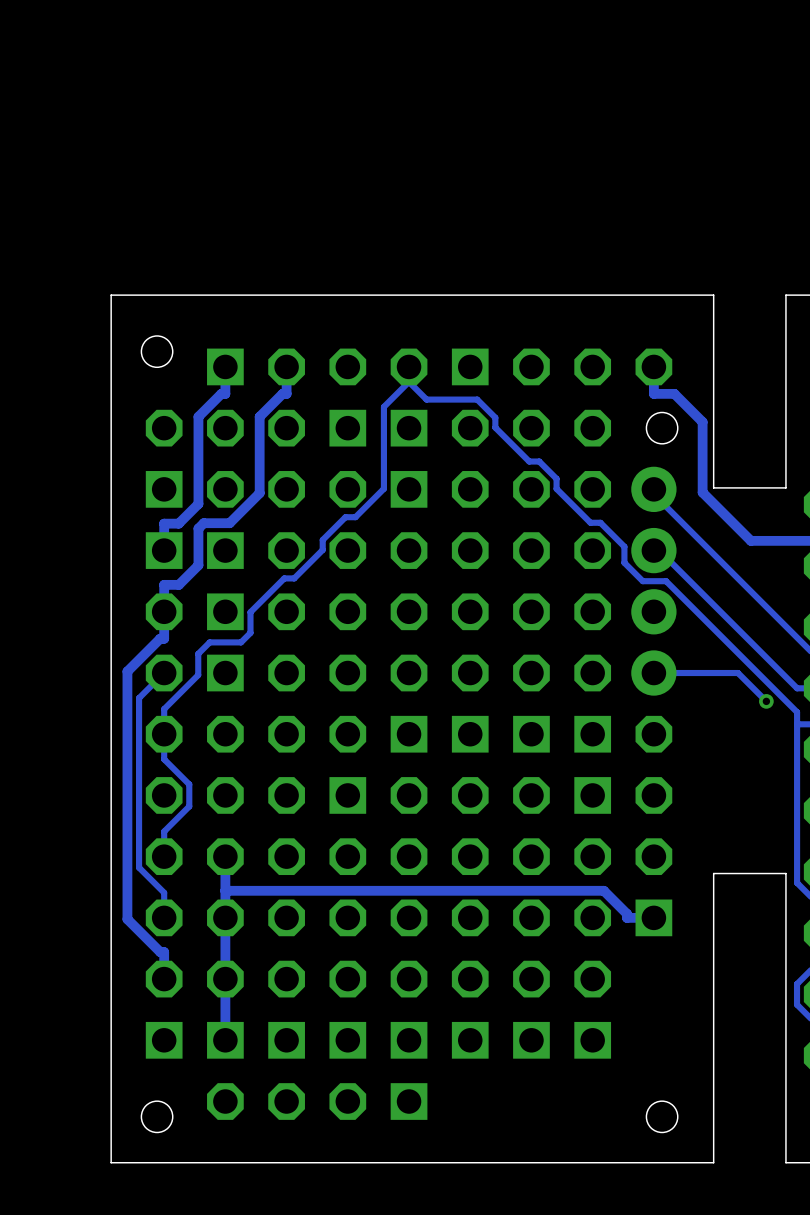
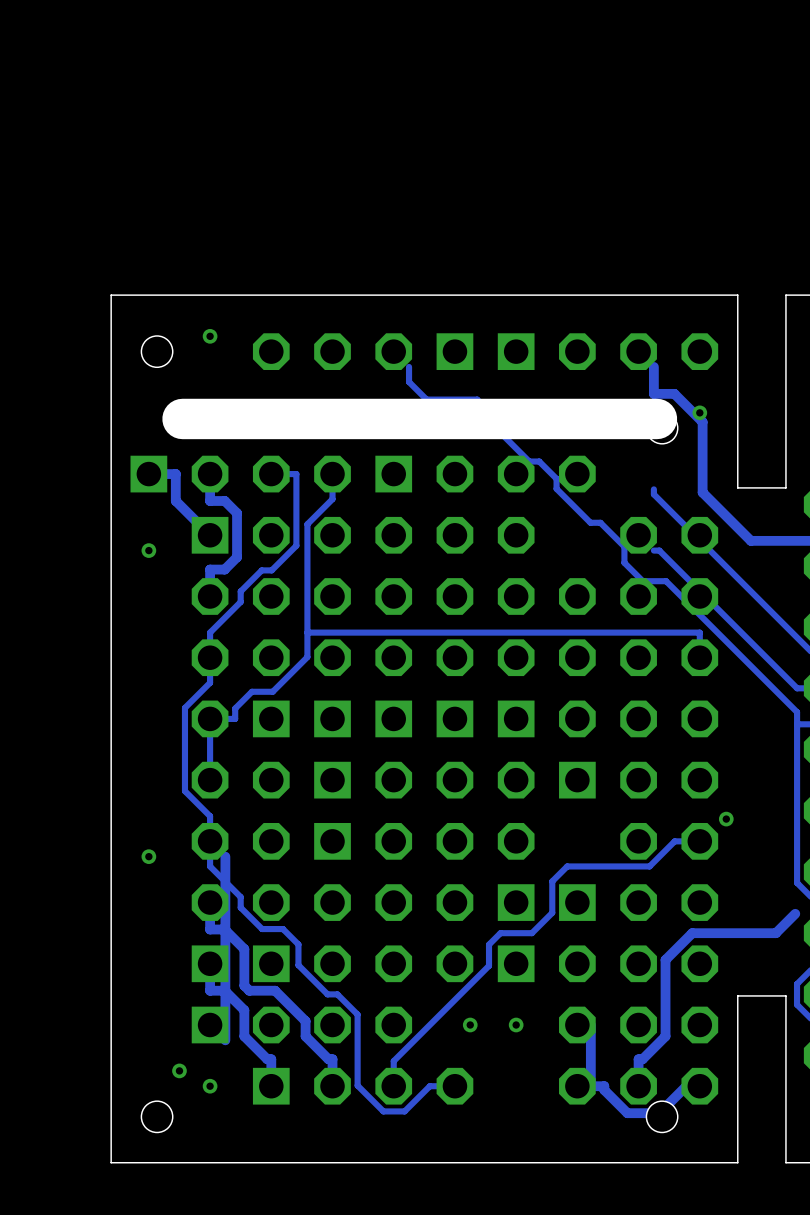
board edge: (713, 295) (713, 487) (737, 487) -> (713, 295) (737, 295) (737, 487)
via: none -> (210, 336)
track: (225, 366) (225, 393) (221, 393) (198, 416) (198, 503) (178, 523) (164, 523) (164, 550) -> none
track: (286, 366) (286, 393) (282, 393) (259, 416) (259, 493) (229, 523) (203, 523) (198, 528) (198, 565) (178, 584) (164, 584) (164, 638) (160, 638) (127, 671) (127, 919) (160, 952) (164, 952) (164, 979) -> none
part rotation: 0° (317, 366) -> 180° (363, 351)
part position: (562, 366) -> (607, 351)
track: (408, 382) (383, 406) (383, 488) (355, 517) (345, 517) (322, 539) (322, 549) (294, 578) (284, 578) (250, 612) (250, 632) (241, 642) (209, 642) (198, 653) (198, 675) (164, 709) (164, 759) (189, 784) (189, 806) (164, 831) (164, 856) -> none
via: none -> (699, 412)
board edge: none -> (656, 418) (182, 418)
part: (256, 428) -> none
part: (500, 428) -> none
track: none -> (148, 474) (175, 474) (175, 501) (210, 535)
track: none -> (210, 474) (210, 501) (224, 501) (237, 513) (237, 557) (224, 569) (210, 569) (210, 596)
track: none -> (271, 474) (296, 474) (296, 545) (271, 570) (261, 570) (240, 591) (240, 602) (210, 632) (210, 682) (184, 707) (184, 791) (210, 816) (210, 866) (240, 897) (240, 907) (262, 929) (283, 929) (298, 944) (298, 965) (327, 994) (337, 994) (357, 1014) (357, 1085) (383, 1111) (404, 1111) (429, 1086) (454, 1086)
track: none -> (332, 474) (332, 499) (307, 524) (307, 657) (272, 691) (251, 691) (235, 708) (235, 718) (210, 718) (210, 780)
part position: (256, 489) -> (240, 474)
part position: (500, 489) -> (485, 474)
via: none -> (148, 550)
part: (317, 550) -> none
part: (653, 581) -> none
part rotation: 0° (317, 611) -> 90° counterclockwise (332, 627)
part: none -> (271, 627)
part: none -> (393, 627)
track: none -> (307, 632) (699, 632) (699, 657)
part position: (164, 642) -> (210, 627)
part position: (470, 642) -> (454, 627)
part position: (531, 642) -> (516, 627)
part position: (592, 642) -> (577, 688)
track: (164, 673) (139, 698) (139, 867) (164, 892) (164, 917) -> none
part: (317, 673) -> none
track: (653, 673) (738, 673) (766, 701) -> none
via: (766, 701) -> none
part footprint: [635, 715, 673, 937] -> [620, 516, 719, 1105]
part: (317, 734) -> none
part: none -> (424, 780)
part: (256, 795) -> none
part: (500, 795) -> none
via: none -> (726, 819)
part: none -> (424, 841)
track: none -> (699, 841) (674, 841) (649, 866) (567, 866) (552, 881) (552, 912) (531, 933) (500, 933) (489, 944) (489, 965) (393, 1061) (393, 1086)
via: none -> (148, 856)
part: none -> (210, 871)
part: none -> (271, 871)
track: (225, 890) (603, 890) (626, 913) (626, 917) (653, 917) -> none
track: none -> (210, 902) (210, 929) (224, 929) (244, 949) (244, 985) (249, 990) (275, 990) (305, 1021) (305, 1036) (328, 1059) (332, 1059) (332, 1086)
part: none -> (424, 902)
track: none -> (795, 913) (775, 933) (692, 933) (665, 959) (665, 1036) (642, 1059) (638, 1059) (638, 1086)
part: (164, 948) -> none
part: (225, 948) -> none
part: (286, 948) -> none
part: (347, 948) -> none
part rotation: 0° (409, 948) -> 90° counterclockwise (424, 963)
part: (470, 948) -> none
part: (531, 948) -> none
part: (592, 948) -> none
track: none -> (210, 963) (210, 990) (224, 990) (244, 1010) (244, 1036) (267, 1059) (271, 1059) (271, 1086)
part: none -> (577, 994)
board edge: (785, 995) (785, 873) (713, 873) (713, 1162) -> (785, 995) (737, 995) (737, 1162) (713, 1162)
part: none -> (301, 1025)
via: none -> (470, 1025)
via: none -> (516, 1025)
track: none -> (590, 1025) (590, 1086)
via: none -> (179, 1070)
via: none -> (210, 1086)
part: none -> (363, 1086)
track: none -> (699, 1086) (686, 1086) (659, 1113) (627, 1113) (604, 1090) (604, 1086) (577, 1086)
part: (317, 1101) -> none

